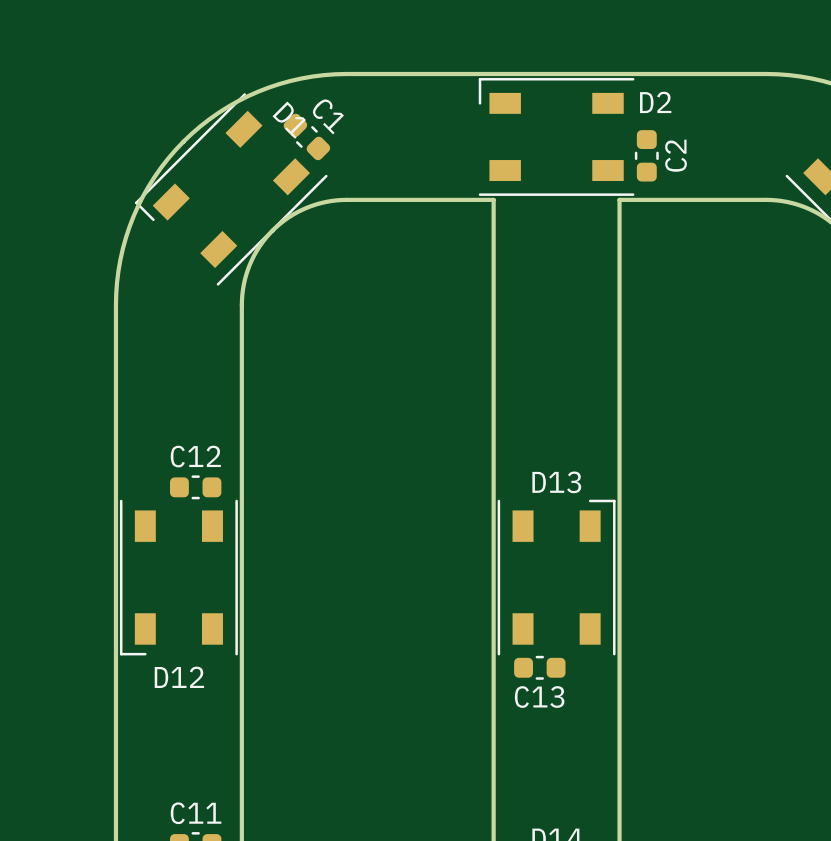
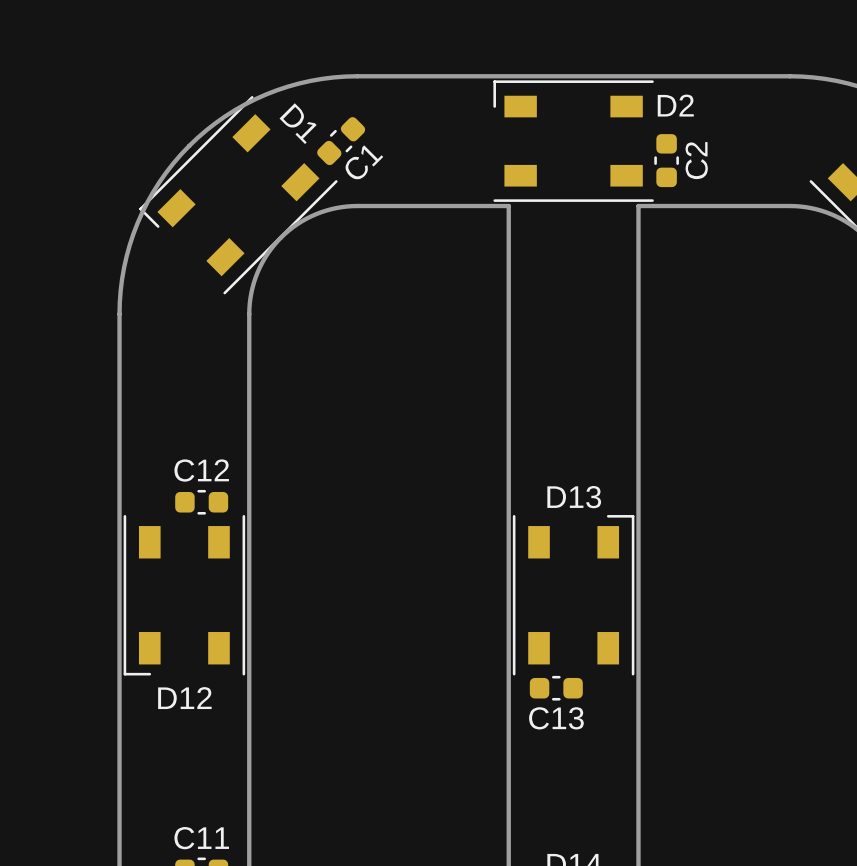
C1 rotation: 0° (306, 136) -> 90° clockwise (341, 141)

